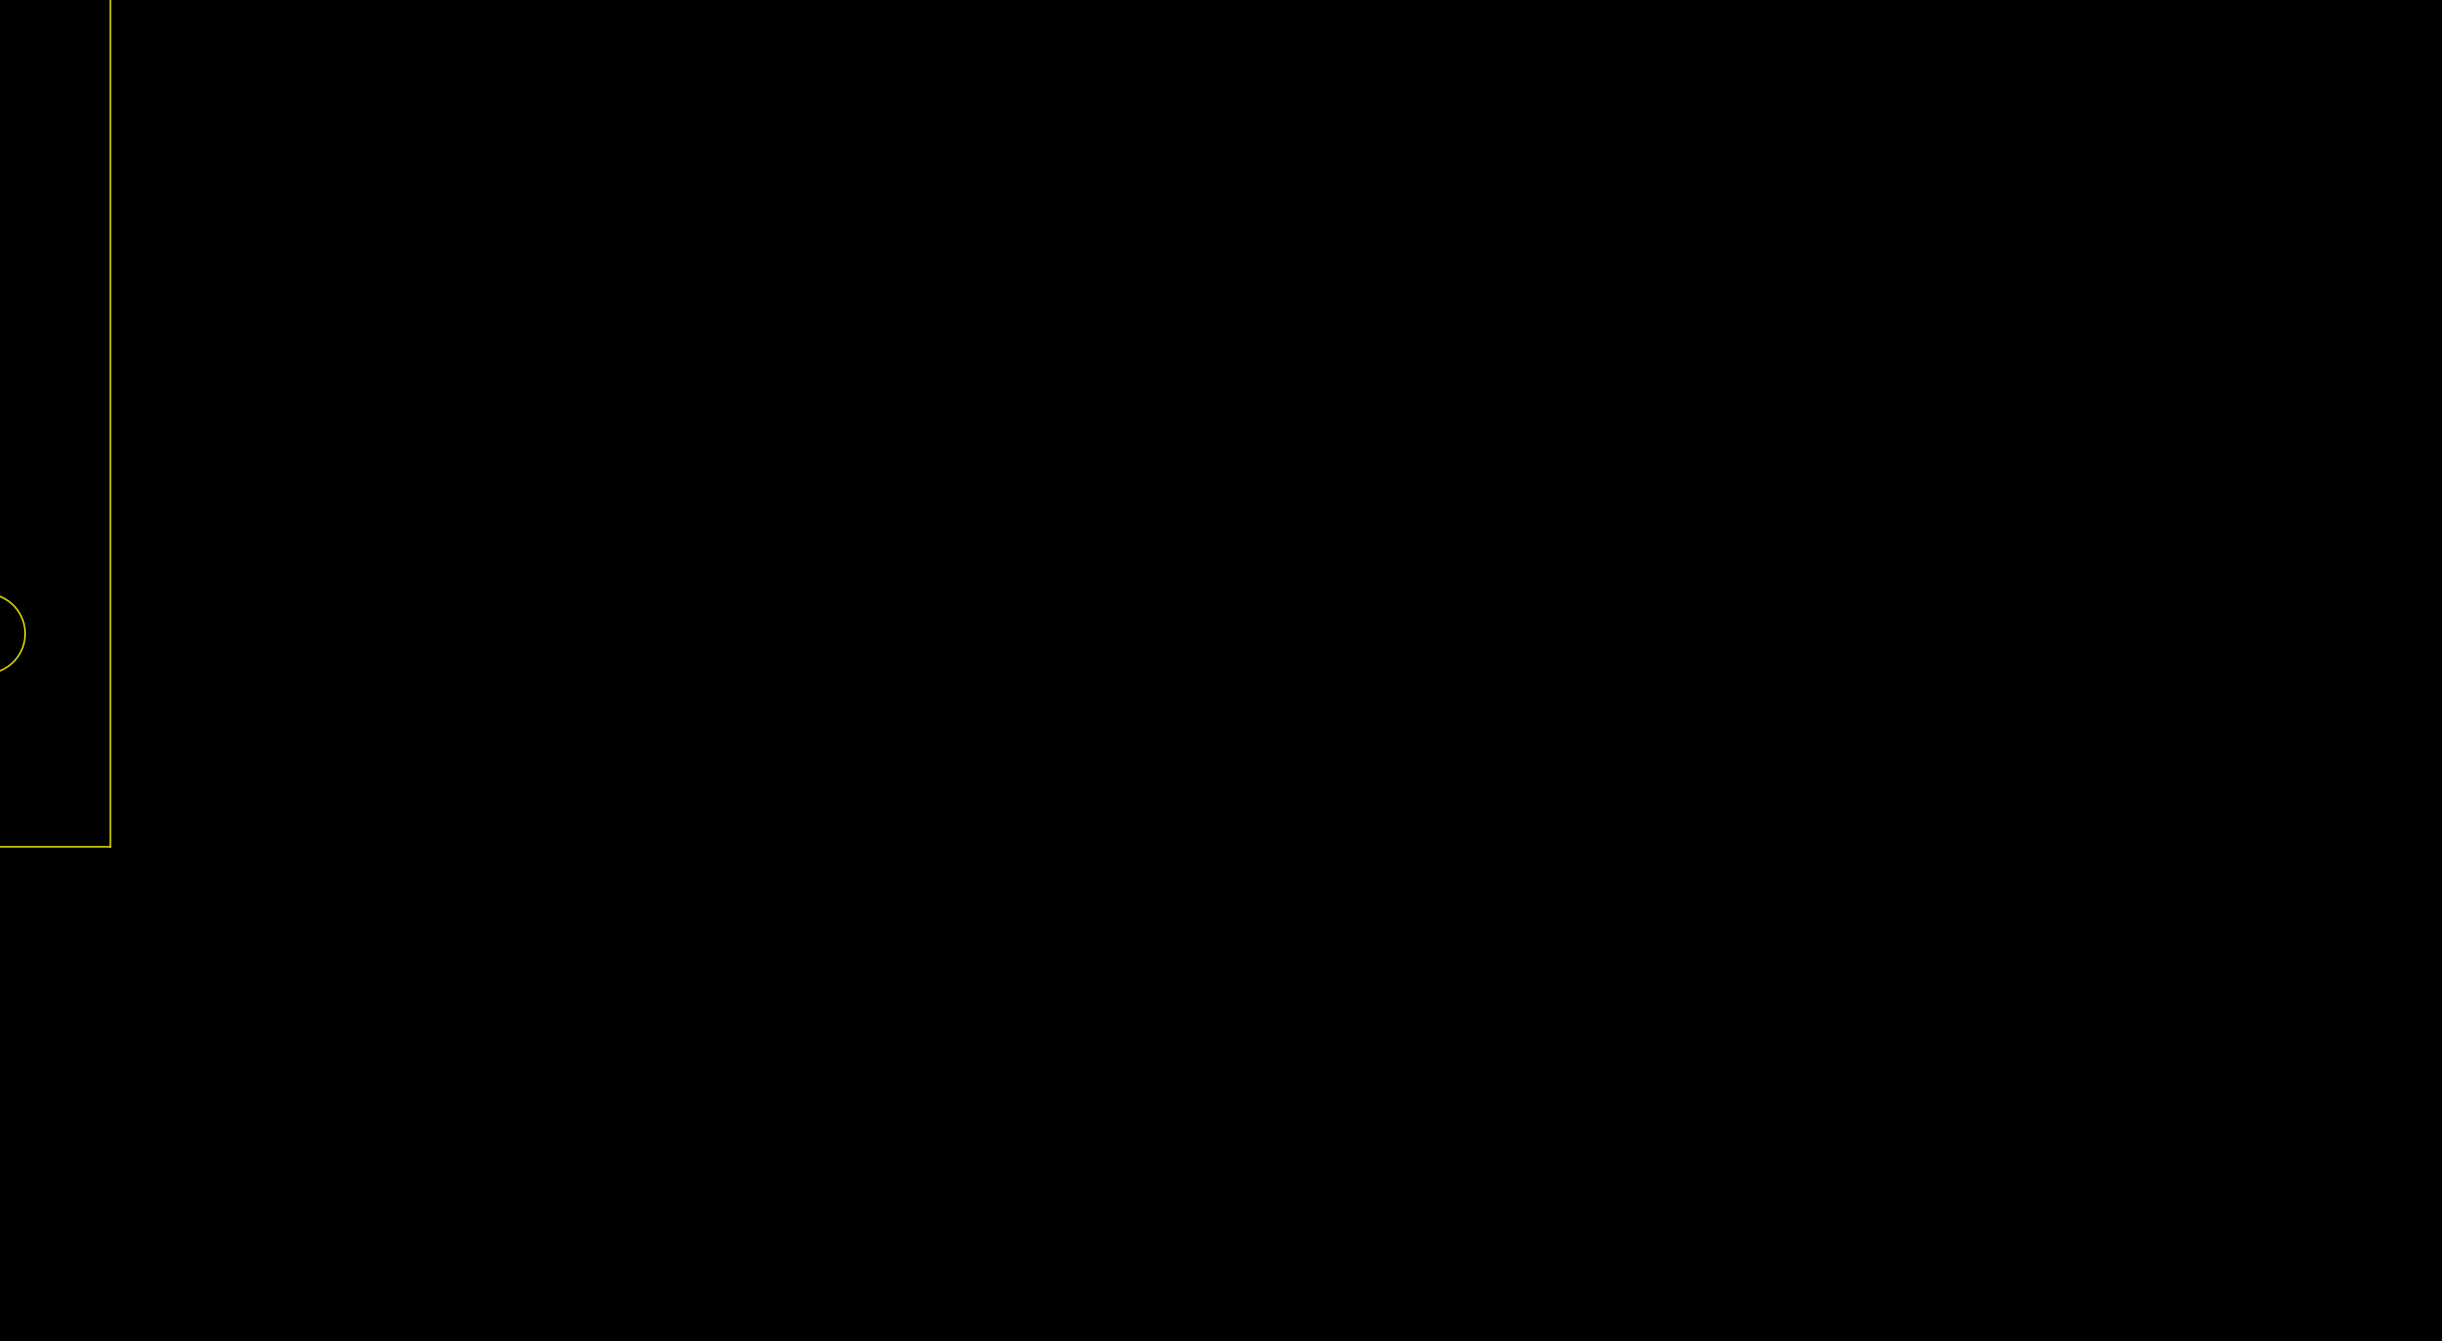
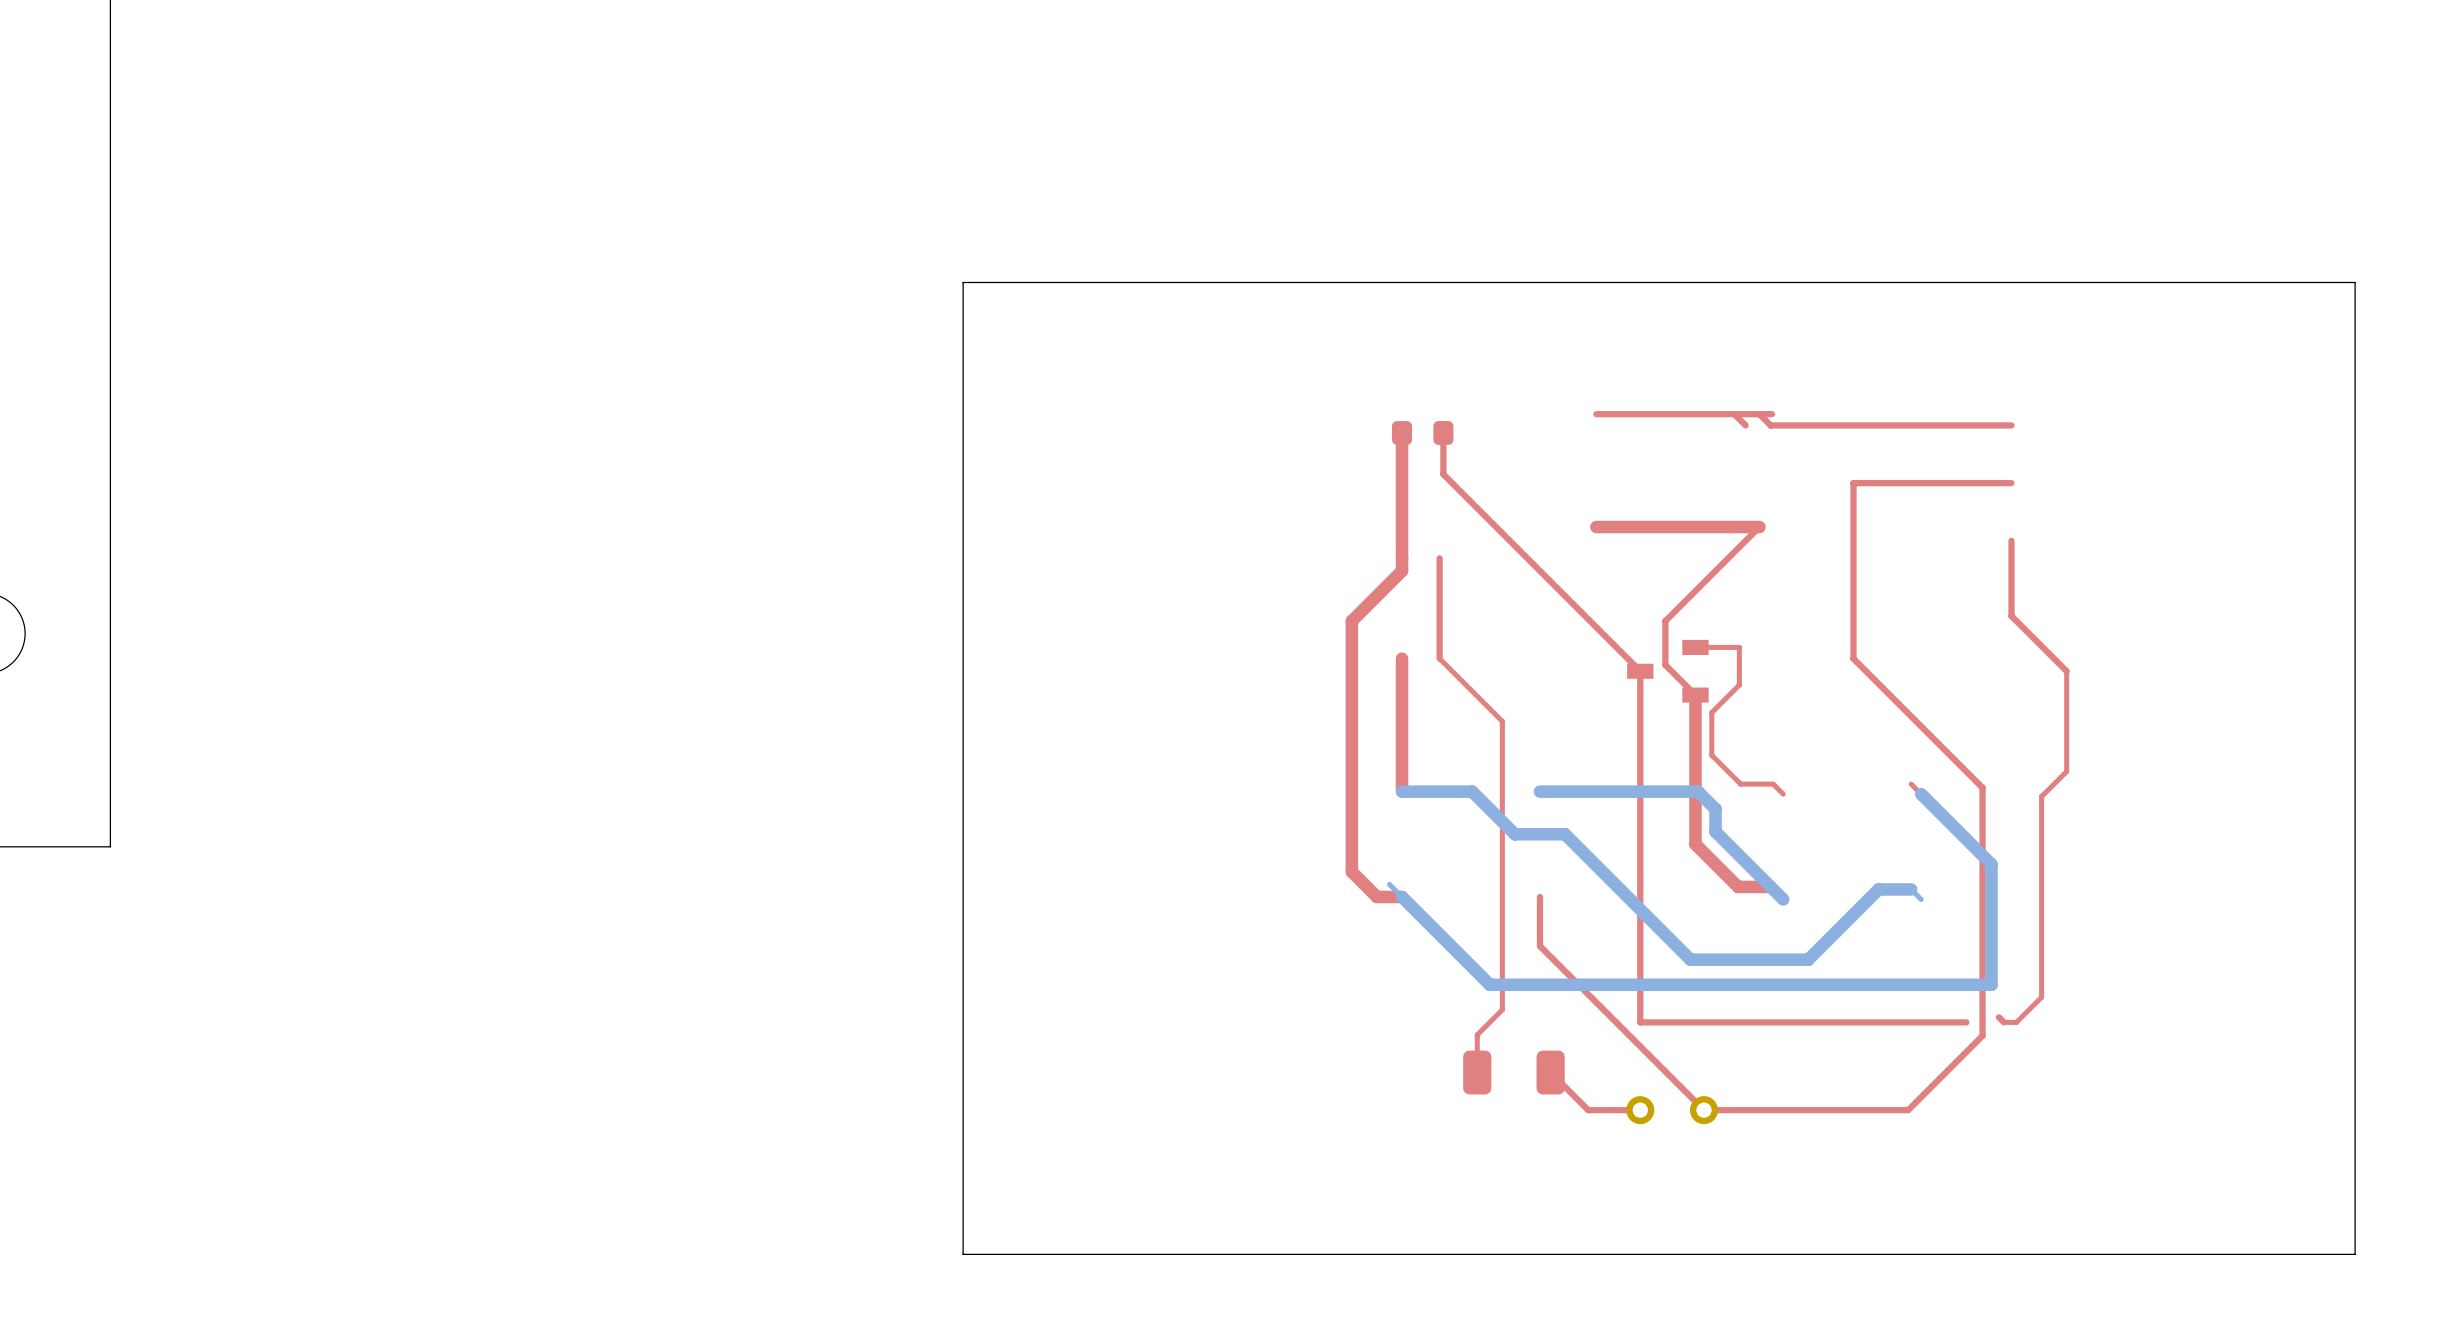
board edge: none -> (2355, 282) (963, 282) (963, 1254) (2355, 1254) (2355, 282)
top track: none -> (1734, 414) (1745, 425)
top track: none -> (1759, 414) (1770, 425) (2011, 425)
top track: none -> (1771, 414) (1596, 414)
top track: none -> (1402, 432) (1402, 570) (1351, 621) (1351, 871) (1376, 896) (1402, 896)
part: none -> (1422, 432)
top track: none -> (1443, 432) (1443, 474) (1640, 671) (1640, 1022) (1966, 1022)
top track: none -> (2011, 483) (1853, 483) (1853, 658) (1982, 787) (1982, 1035) (1908, 1110) (1704, 1110) (1539, 946) (1539, 896)
top track: none -> (1596, 527) (1759, 527) (1665, 621) (1665, 664) (1695, 695) (1695, 844) (1738, 886) (1770, 886) (1783, 899)
top track: none -> (2011, 540) (2011, 616) (2066, 671) (2066, 771) (2041, 796) (2041, 997) (2016, 1022) (2003, 1022) (1998, 1017)
top track: none -> (1439, 558) (1439, 658) (1502, 721) (1502, 1009) (1477, 1034) (1477, 1072)
top track: none -> (1695, 647) (1739, 647) (1739, 685) (1711, 712) (1711, 755) (1740, 784) (1773, 784) (1783, 794)
top track: none -> (1402, 658) (1402, 791)
part: none -> (1667, 671)
top track: none -> (1911, 784) (1921, 794)
bottom track: none -> (1402, 791) (1472, 791) (1514, 834) (1565, 834) (1690, 959) (1808, 959) (1878, 889) (1911, 889) (1921, 899)
bottom track: none -> (1539, 791) (1697, 791) (1715, 809) (1715, 831) (1783, 899)
bottom track: none -> (1921, 794) (1991, 864) (1991, 984) (1489, 984) (1389, 884)
part: none -> (1513, 1072)
top track: none -> (1550, 1072) (1588, 1110) (1640, 1110)
part: none -> (1672, 1110)

